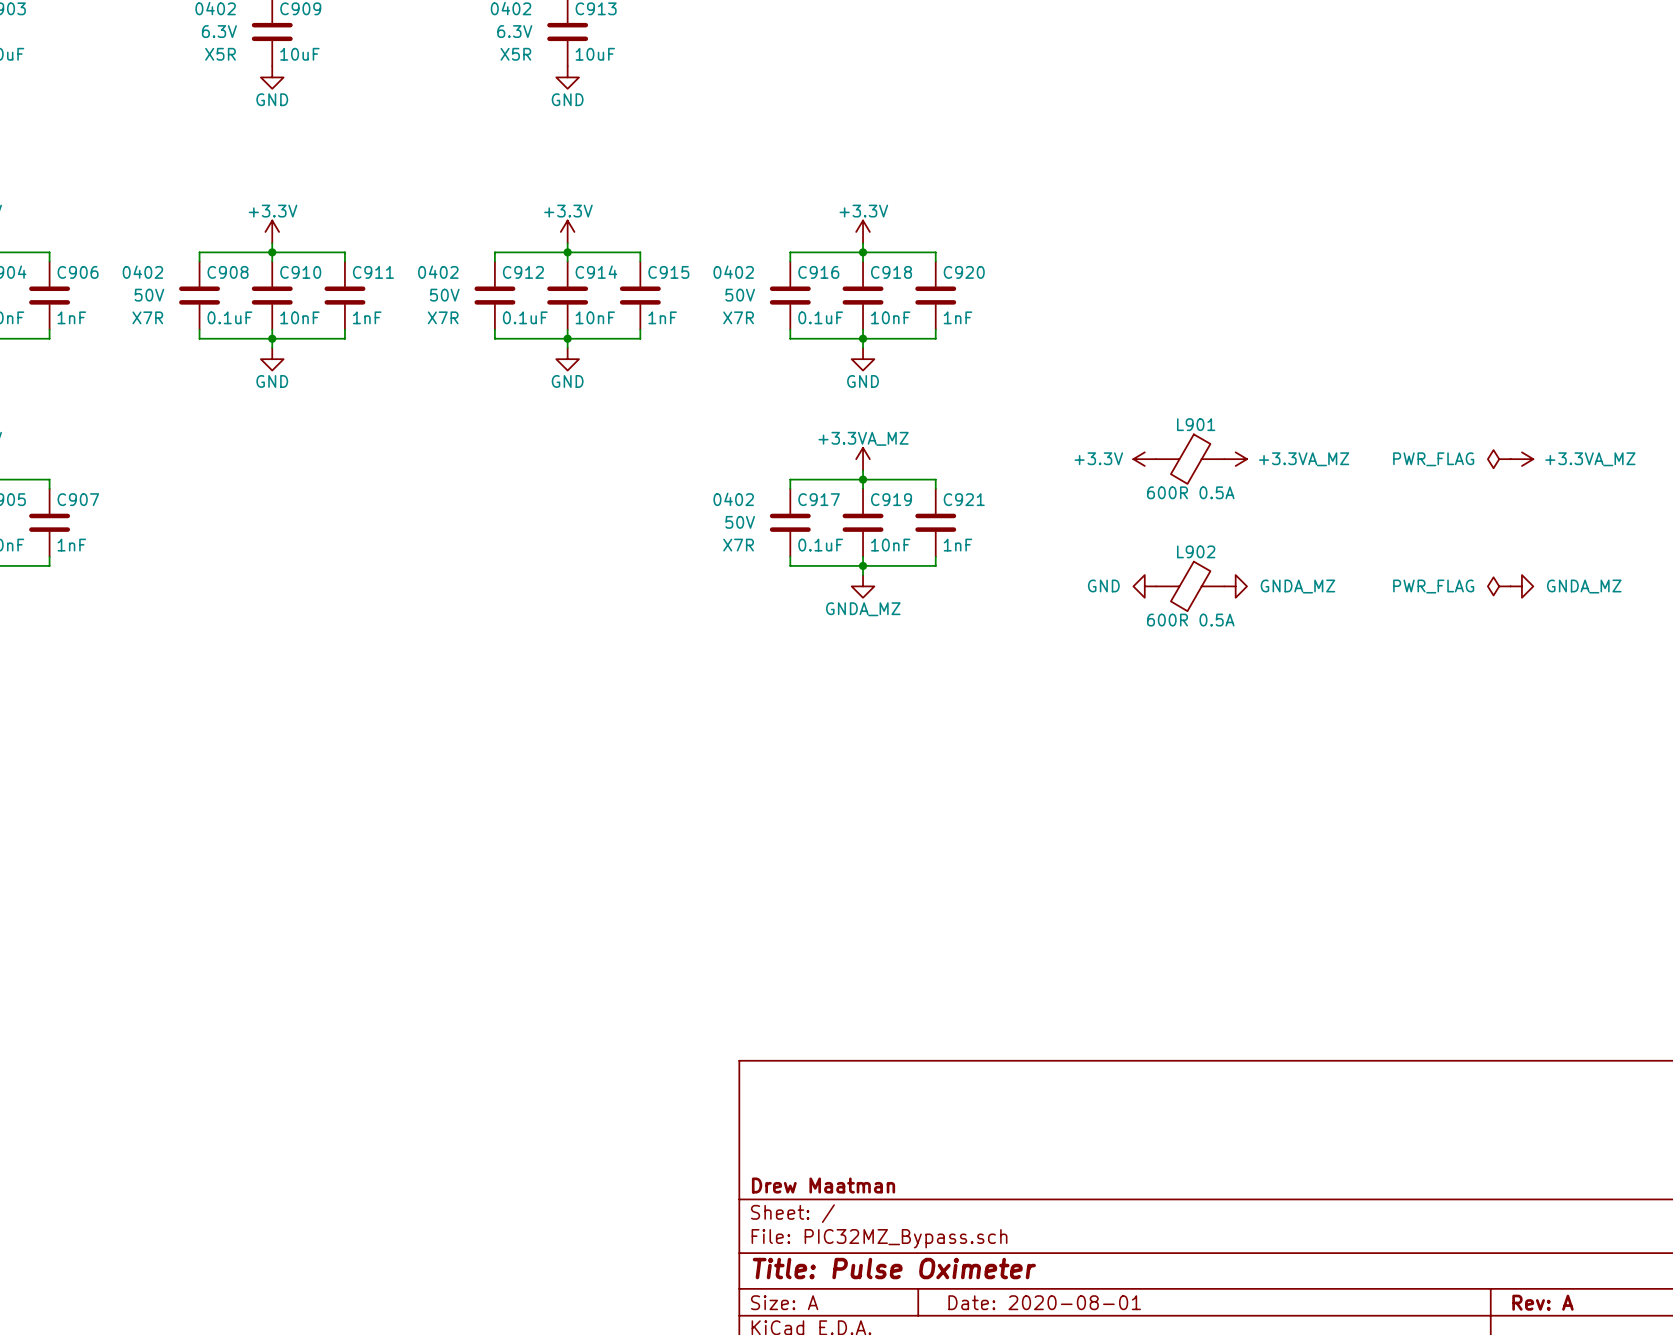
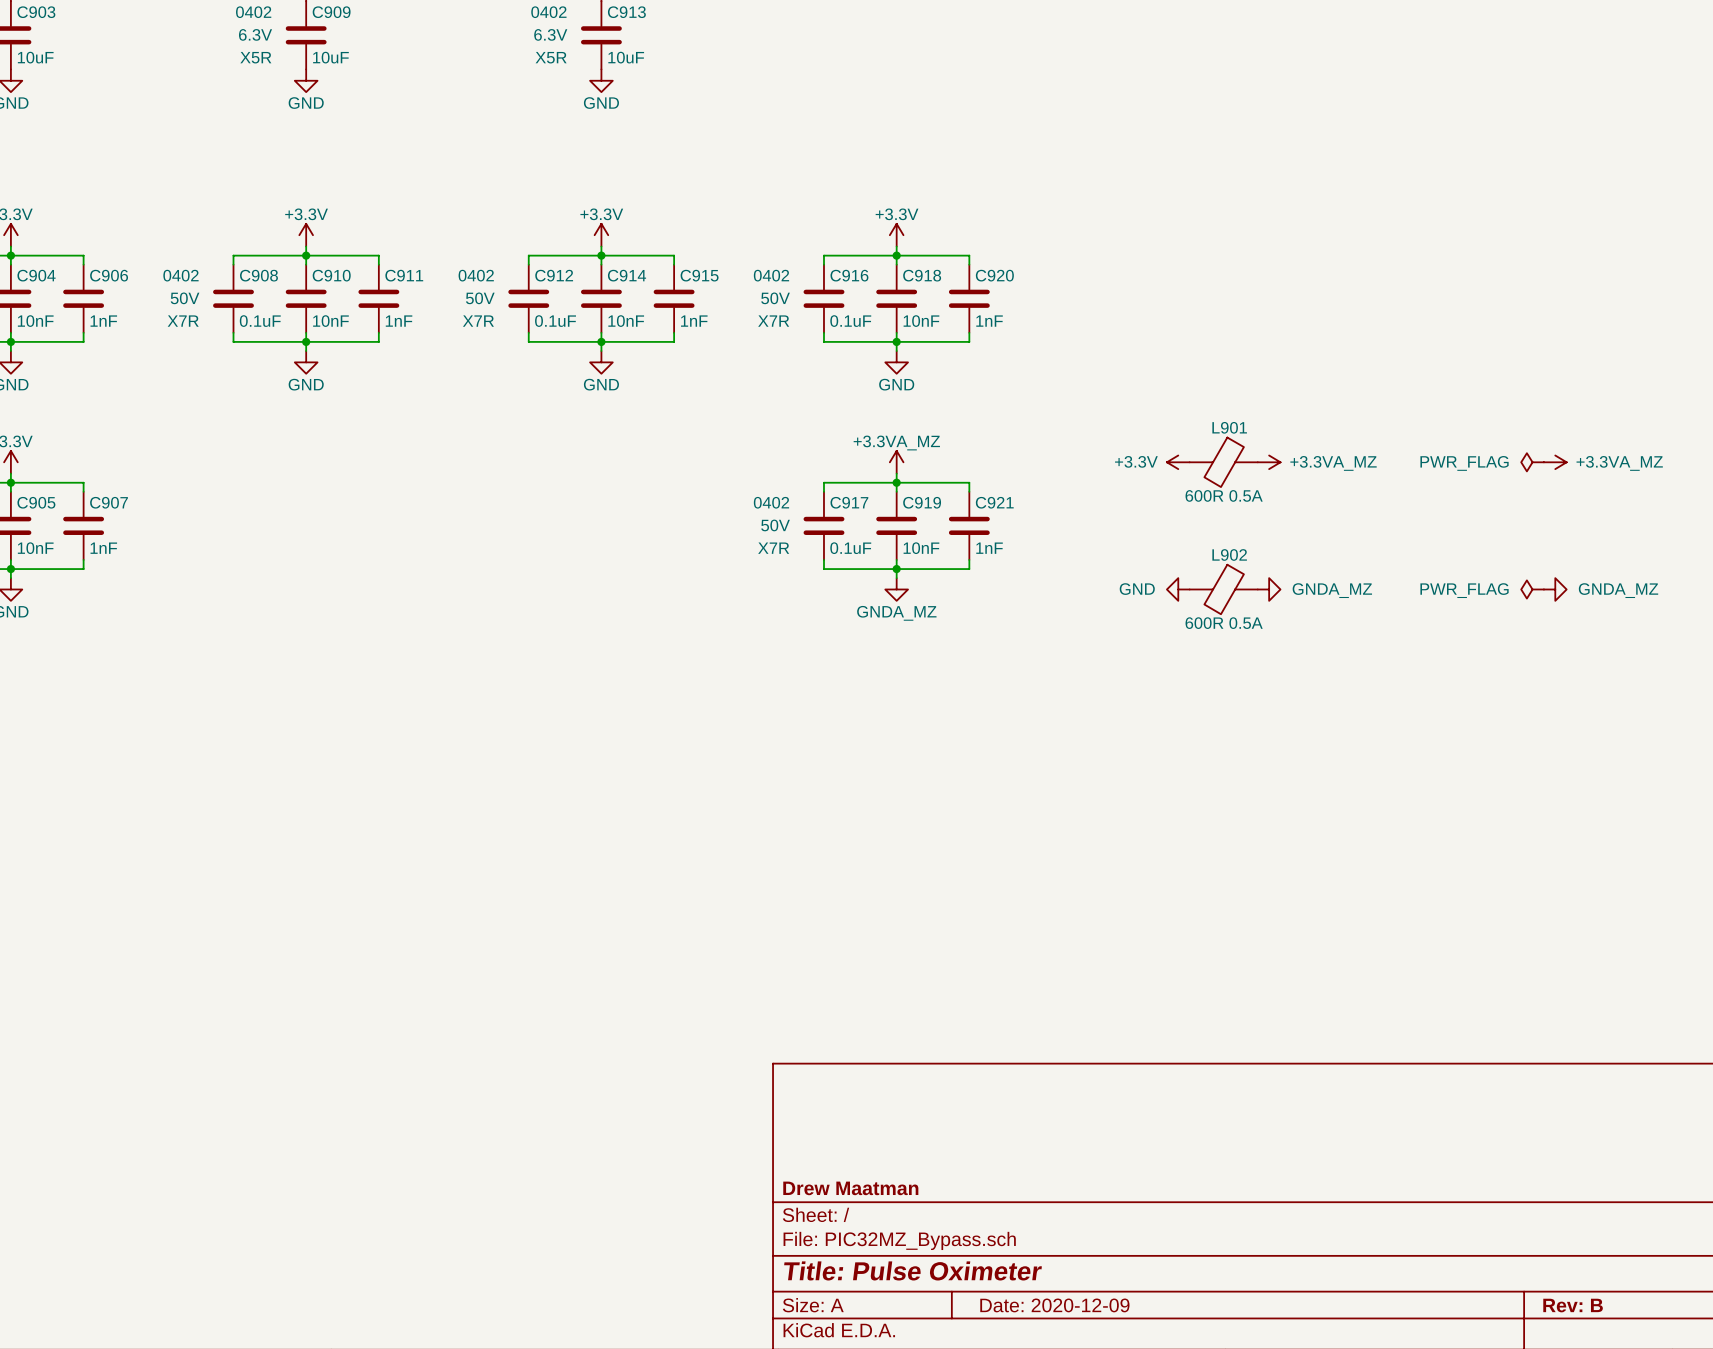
title block: Date: 2020-08-01 (1044, 1302) -> Date: 2020-12-09 (1054, 1305)
title block: Rev: A (1543, 1302) -> Rev: B (1573, 1305)

